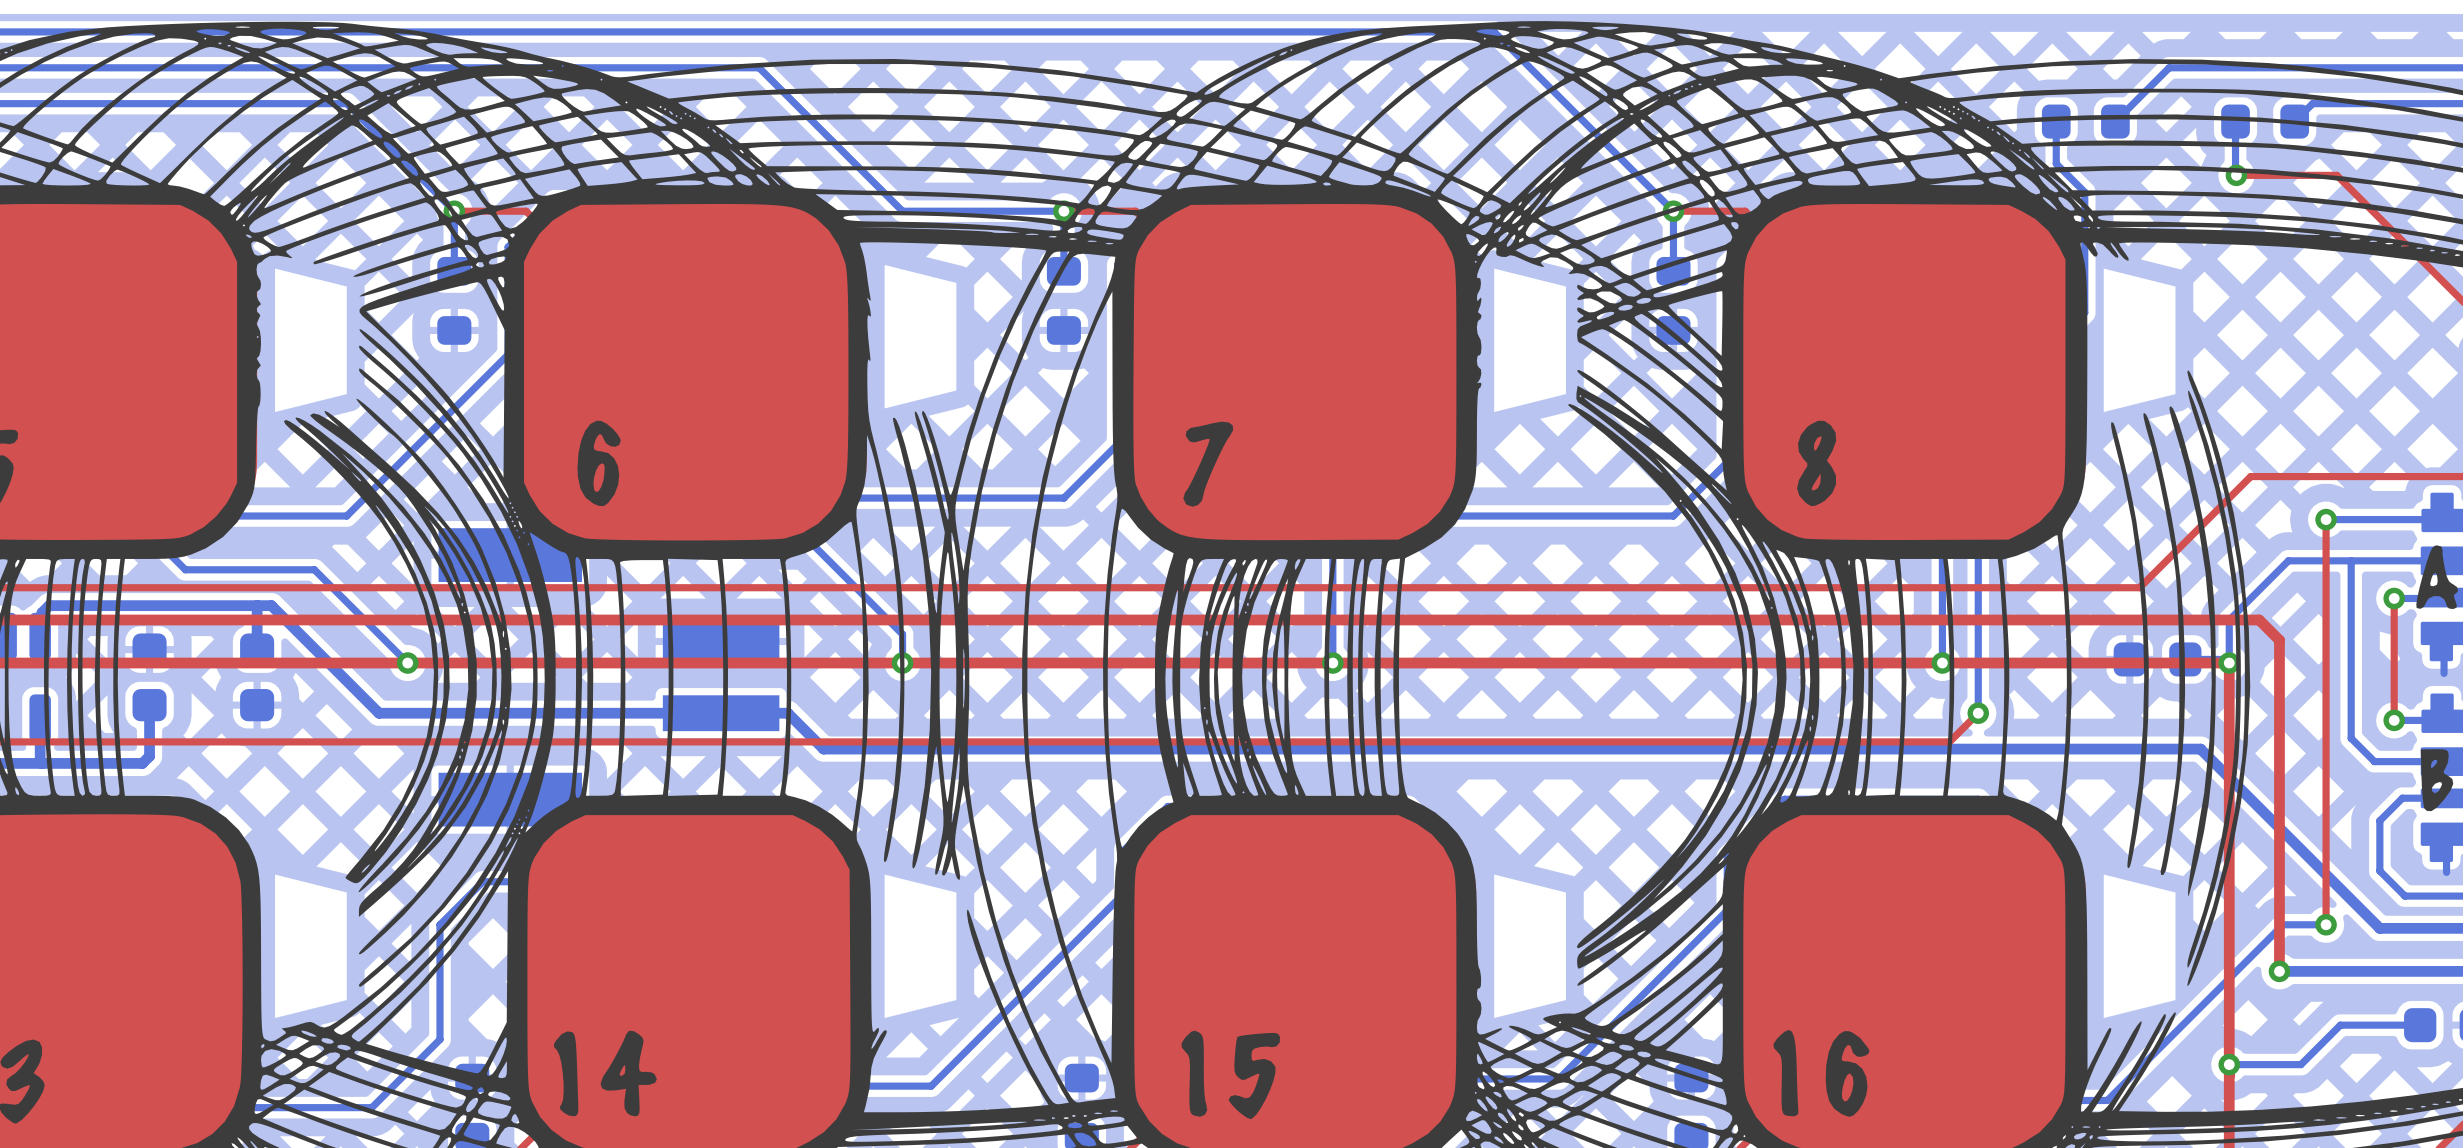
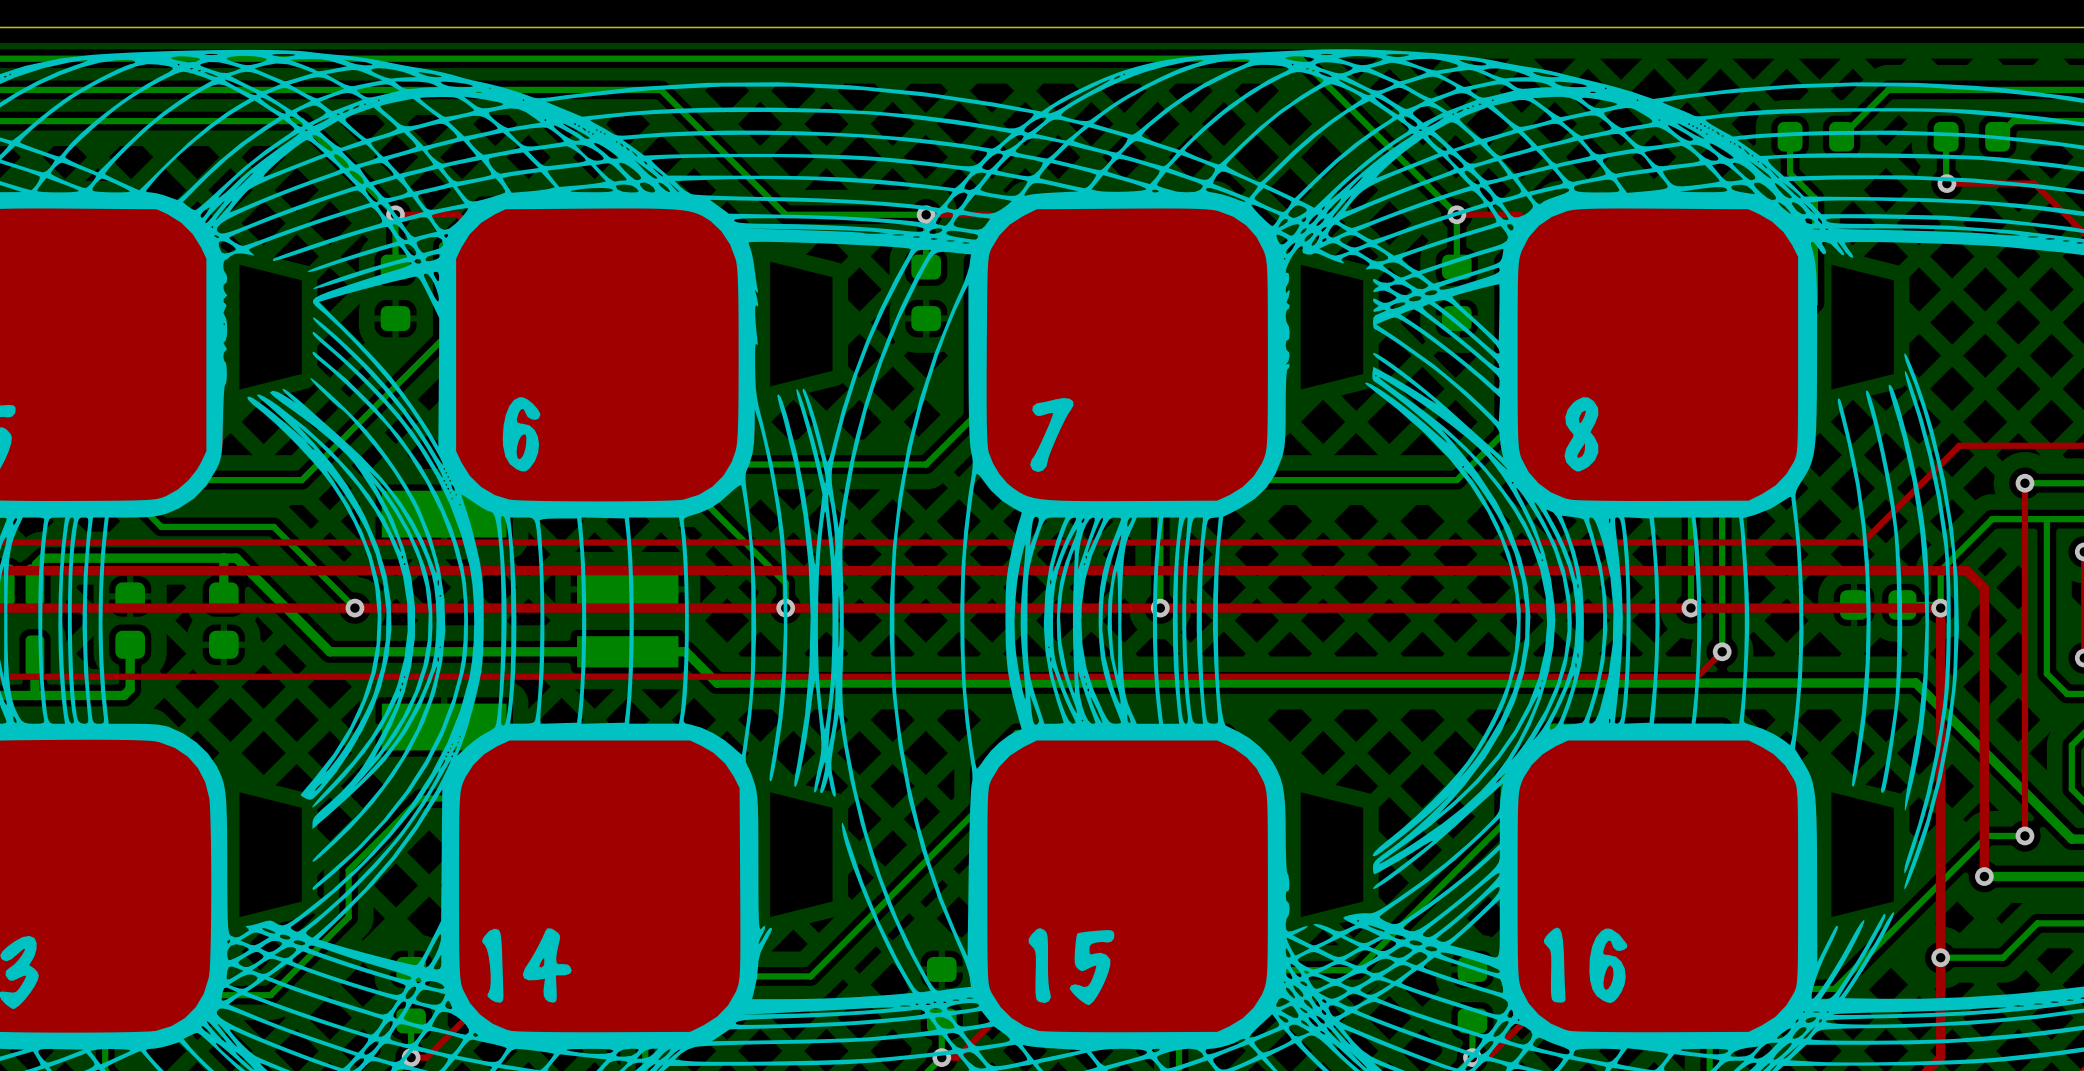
bottom track: (439, 924) (439, 1039) (371, 1107) (310, 1107) -> (383, 835) (348, 870) (348, 917) (270, 995)

